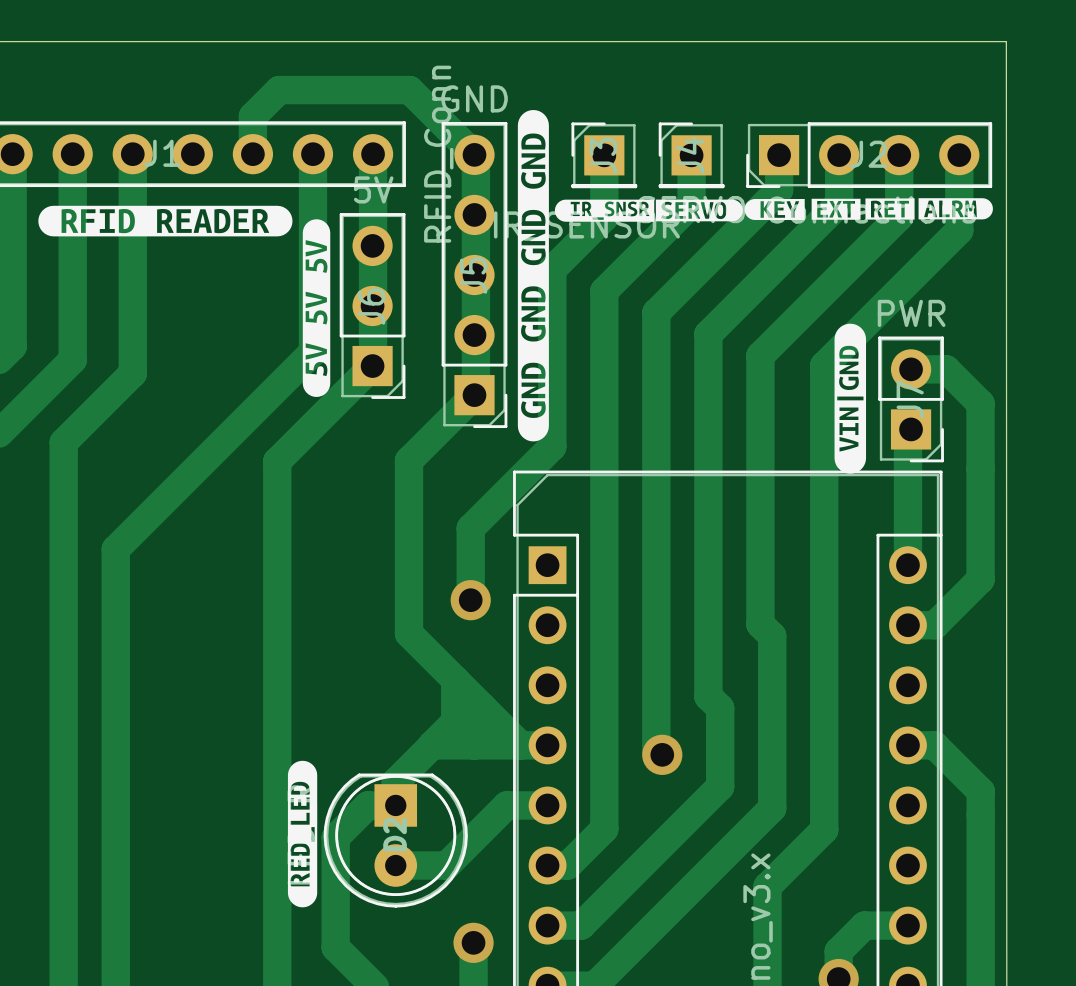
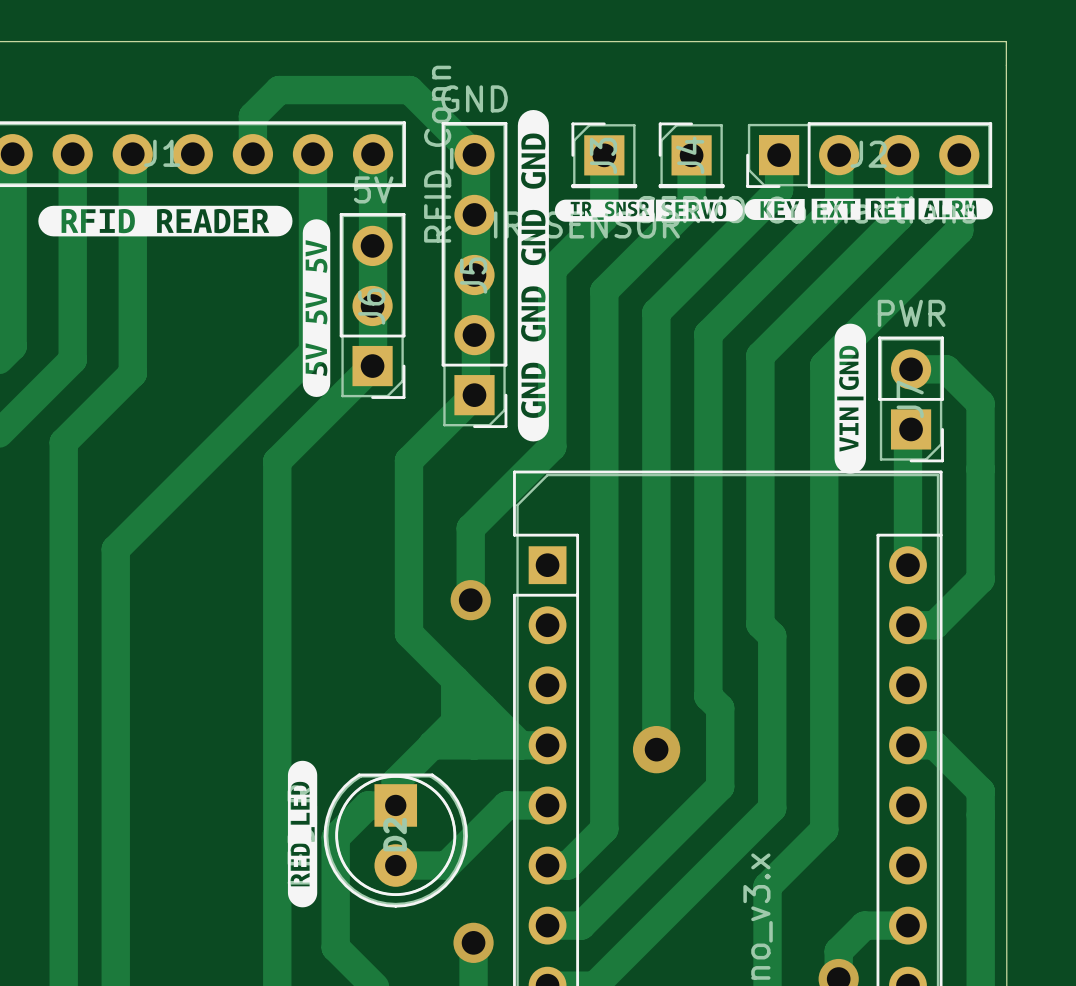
via size: [642, 734, 683, 775] -> [632, 725, 681, 774]

